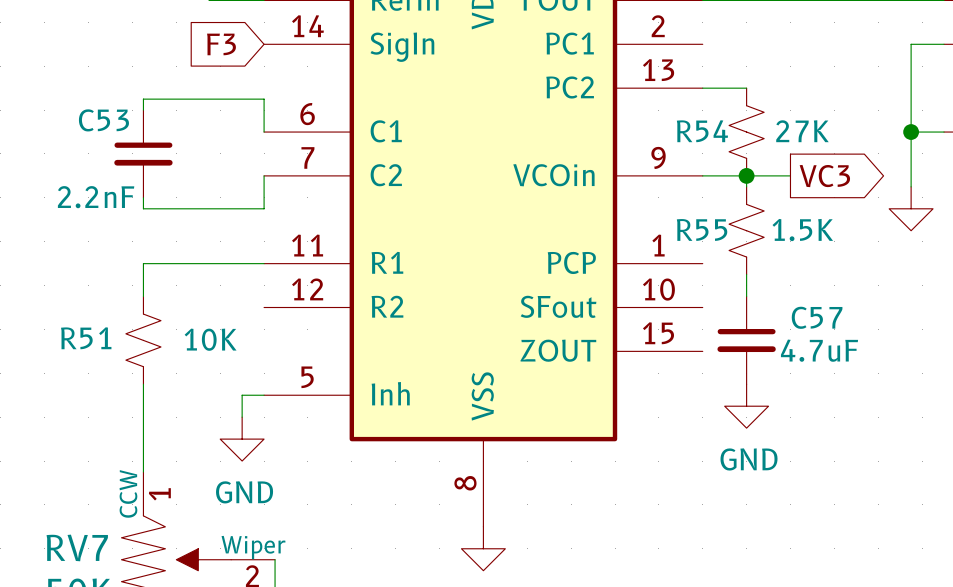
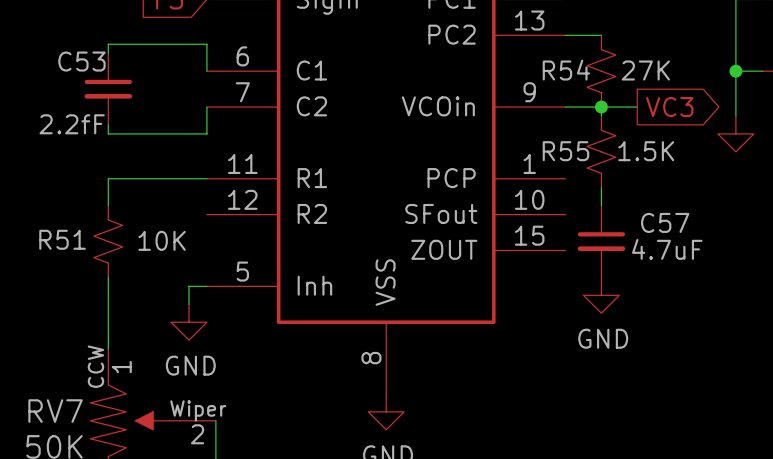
C53 value: 2.2nF (96, 197) -> 2.2fF (72, 124)

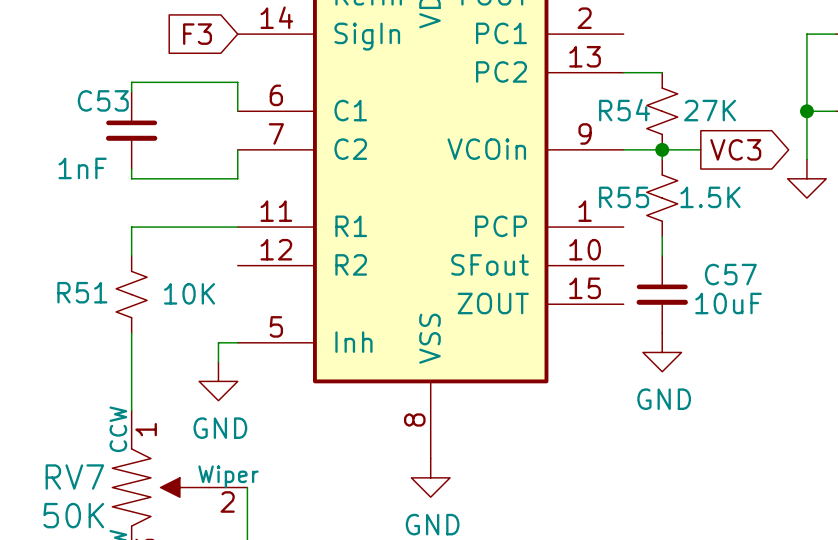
C53 value: 2.2fF (72, 124) -> 1nF (82, 168)
C57 value: 4.7uF (667, 249) -> 10uF (728, 303)

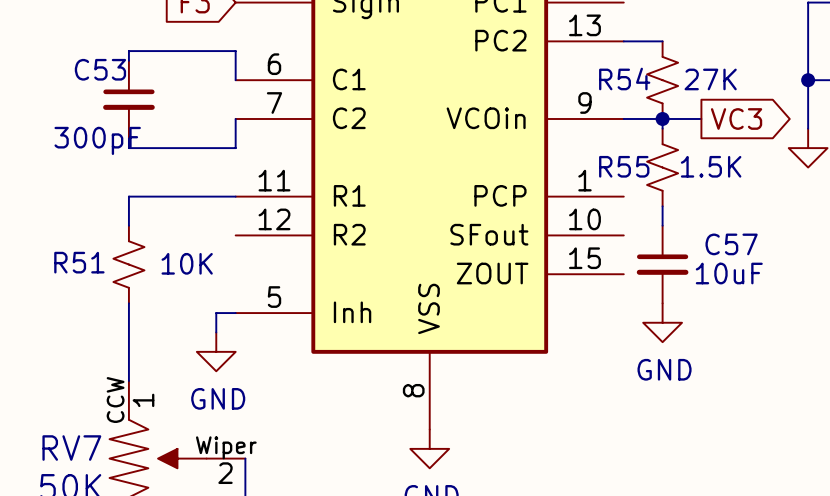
C53 value: 1nF (82, 168) -> 300pF (97, 140)

